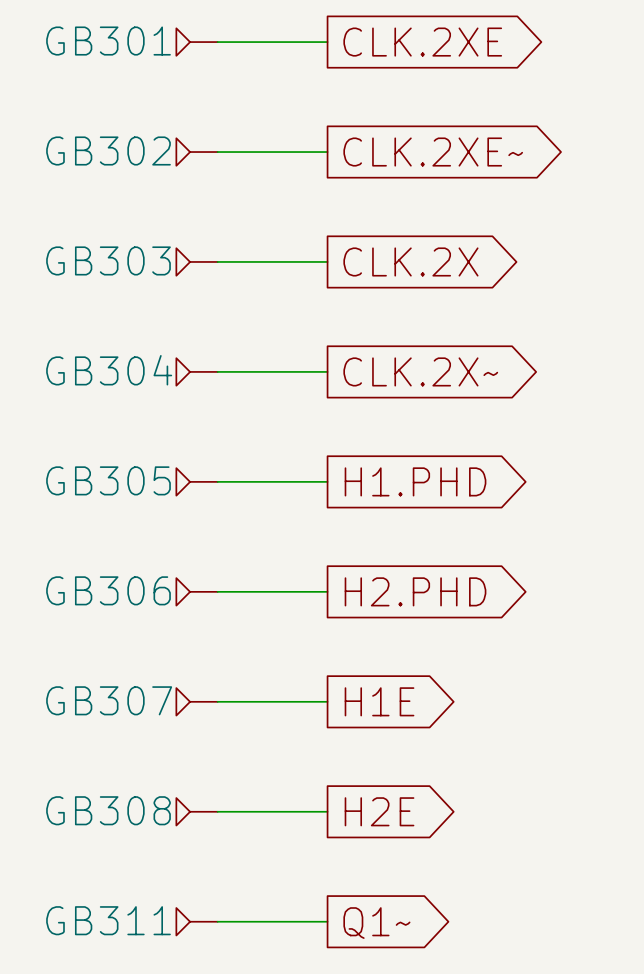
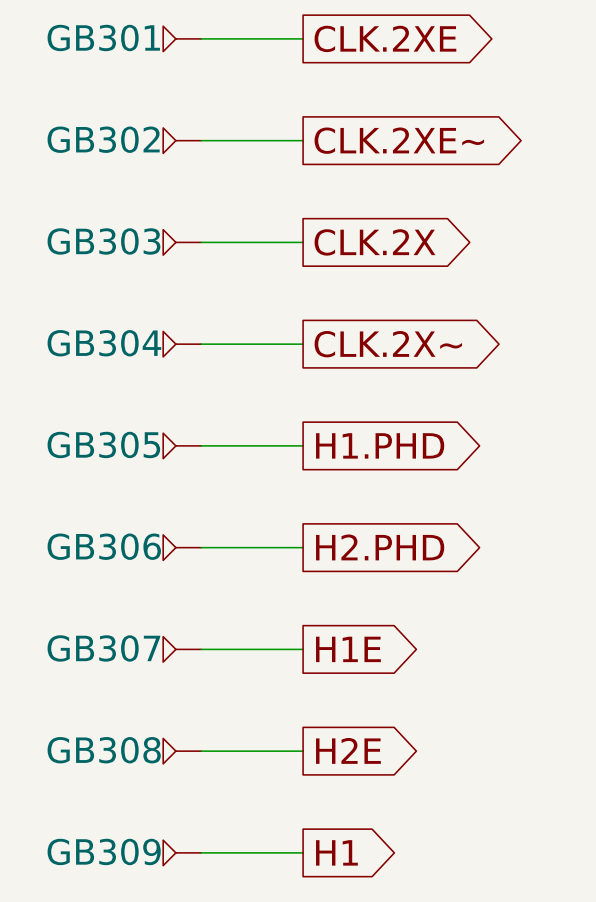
GB311 name: GB311 (108, 920) -> GB309 (104, 851)
global label: Q1~ (376, 923) -> H1 (336, 852)

